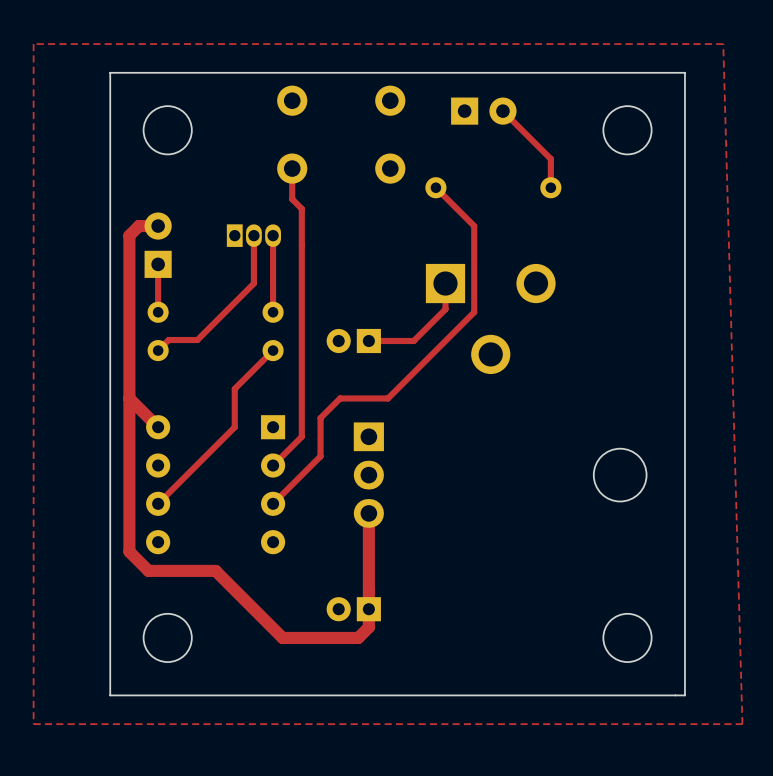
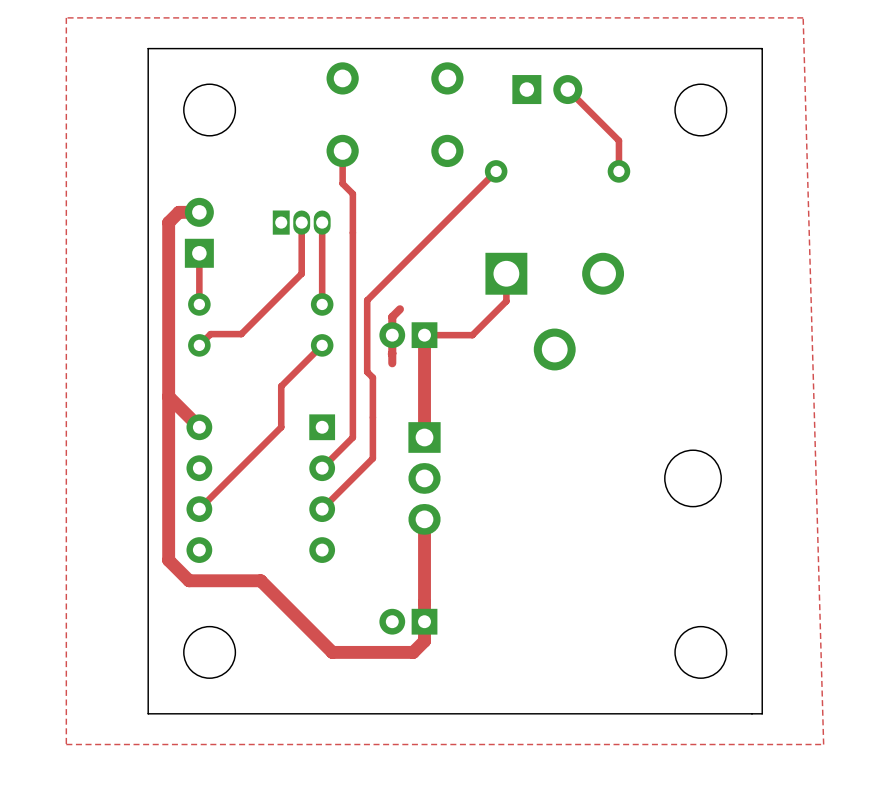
top track: (435, 187) (474, 226) (474, 312) (388, 398) (340, 398) (320, 418) -> (496, 171) (367, 300) (367, 371) (372, 377) (372, 417)
top track: none -> (399, 309) (392, 316) (392, 363)
top track: none -> (424, 335) (424, 437)

